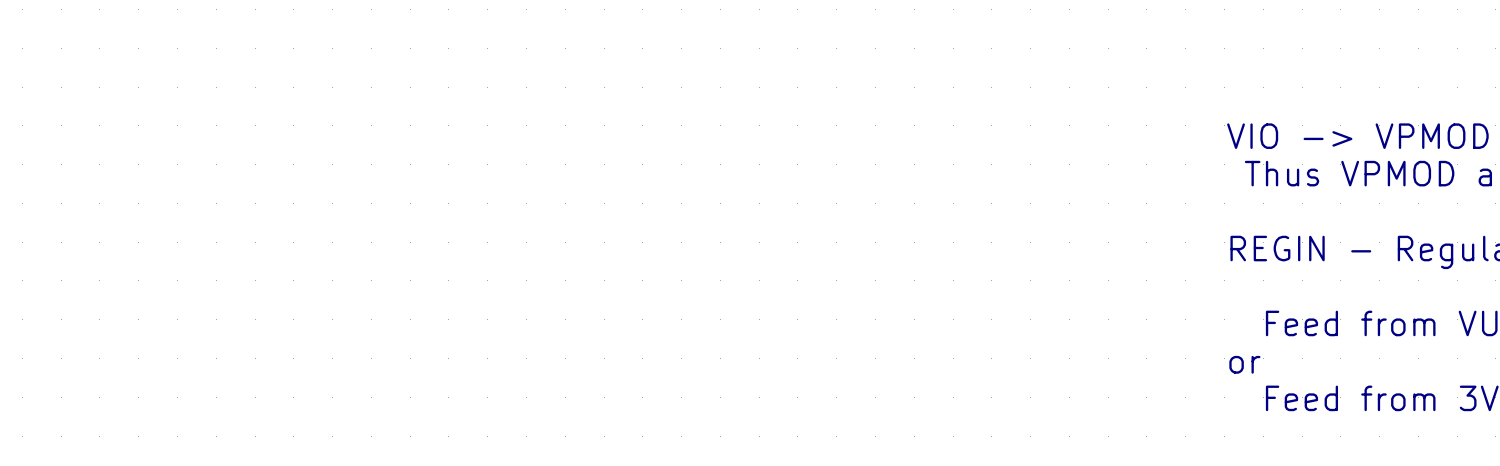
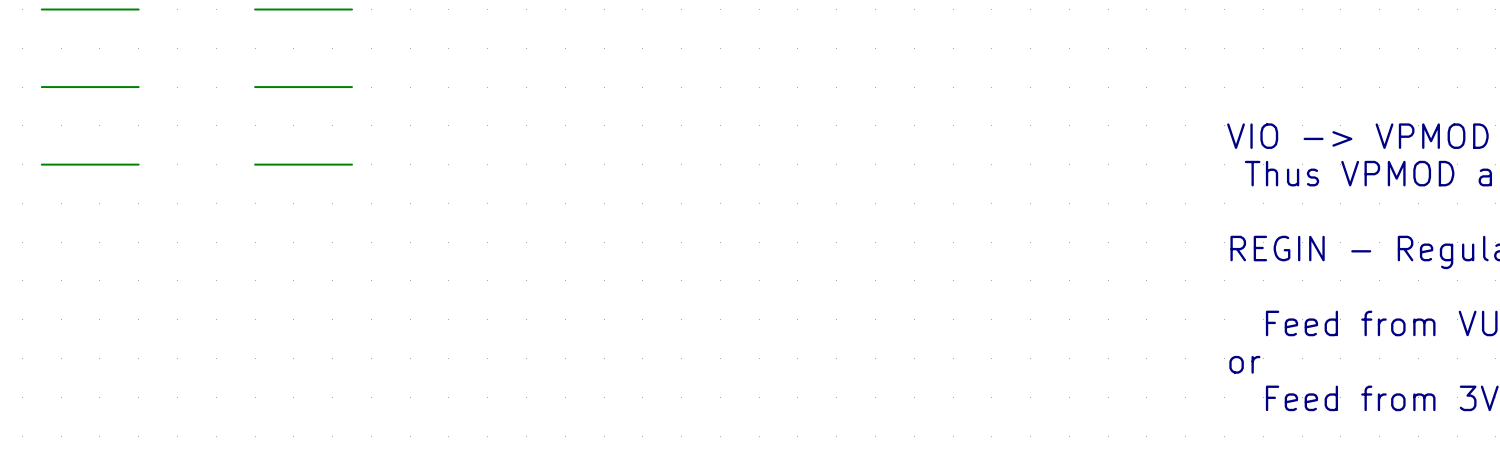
wire: none -> (41, 9) (138, 9)
wire: none -> (255, 9) (352, 9)
wire: none -> (41, 87) (138, 87)
wire: none -> (255, 87) (352, 87)
wire: none -> (41, 164) (138, 164)
wire: none -> (255, 164) (352, 164)

